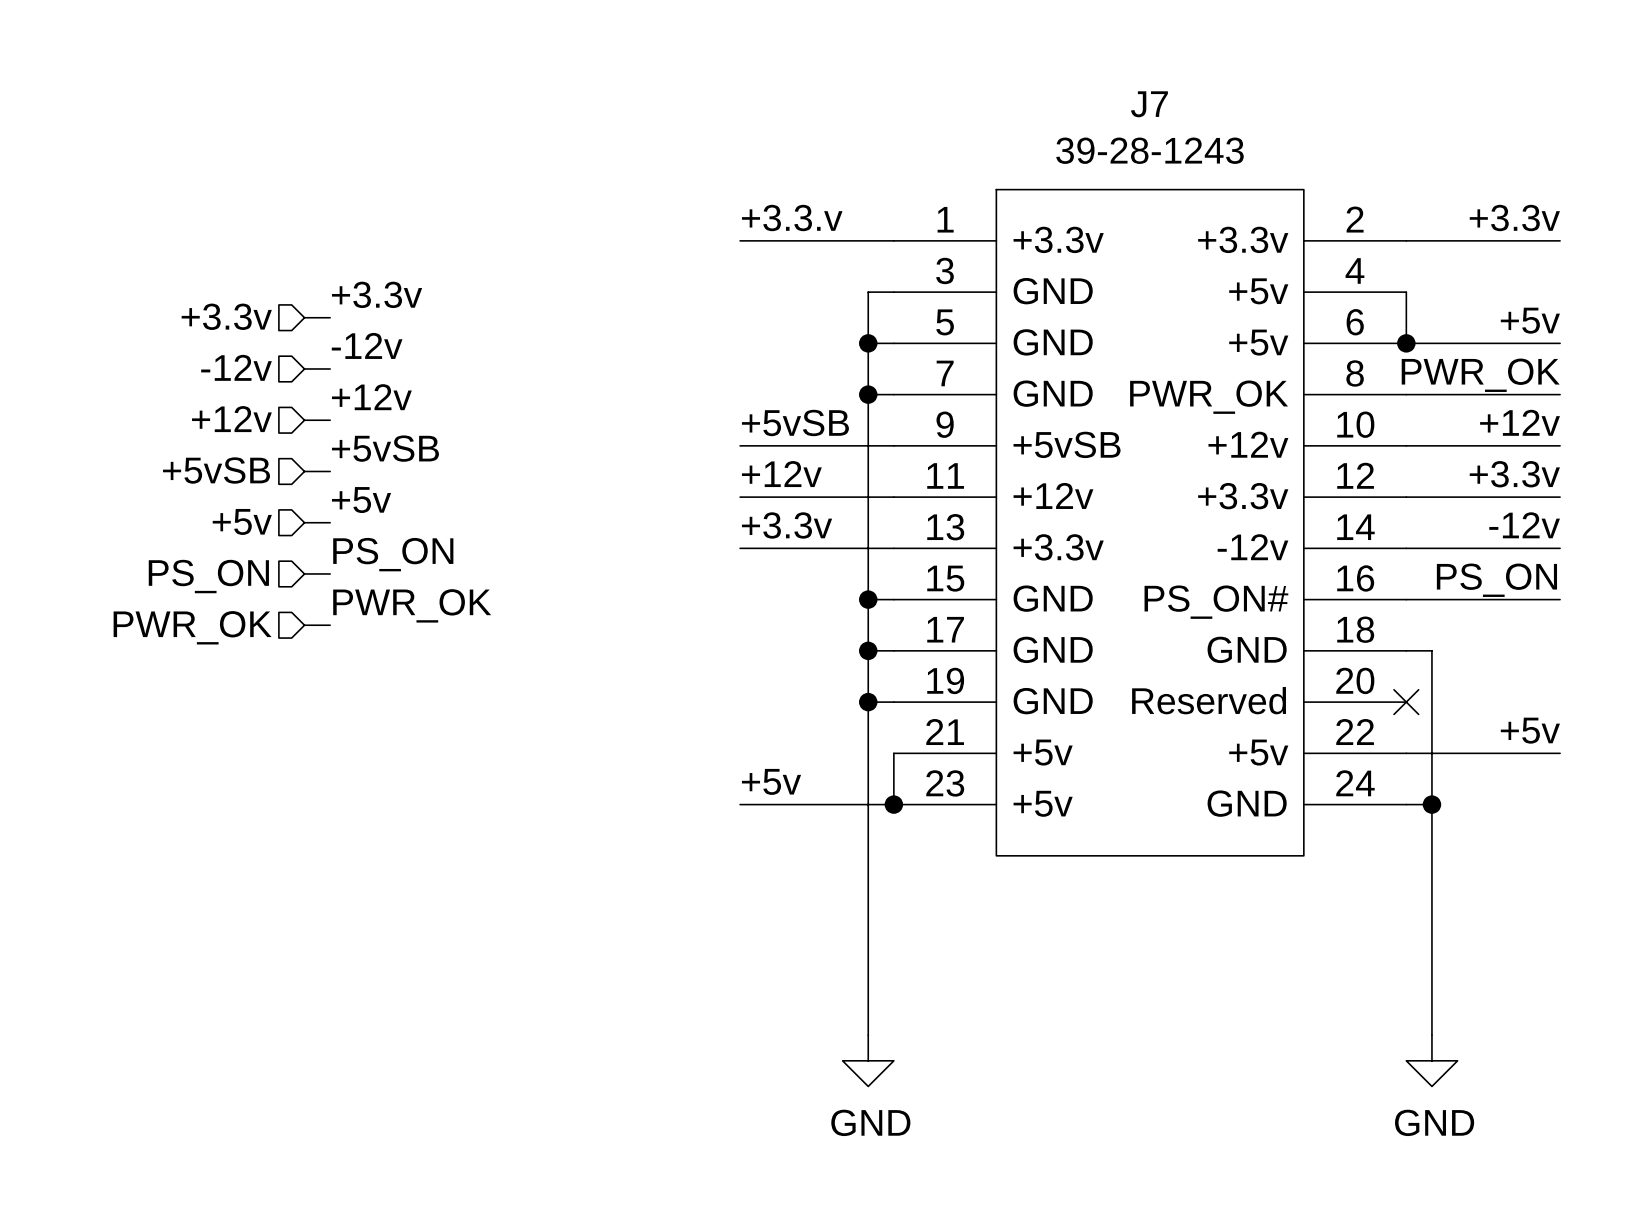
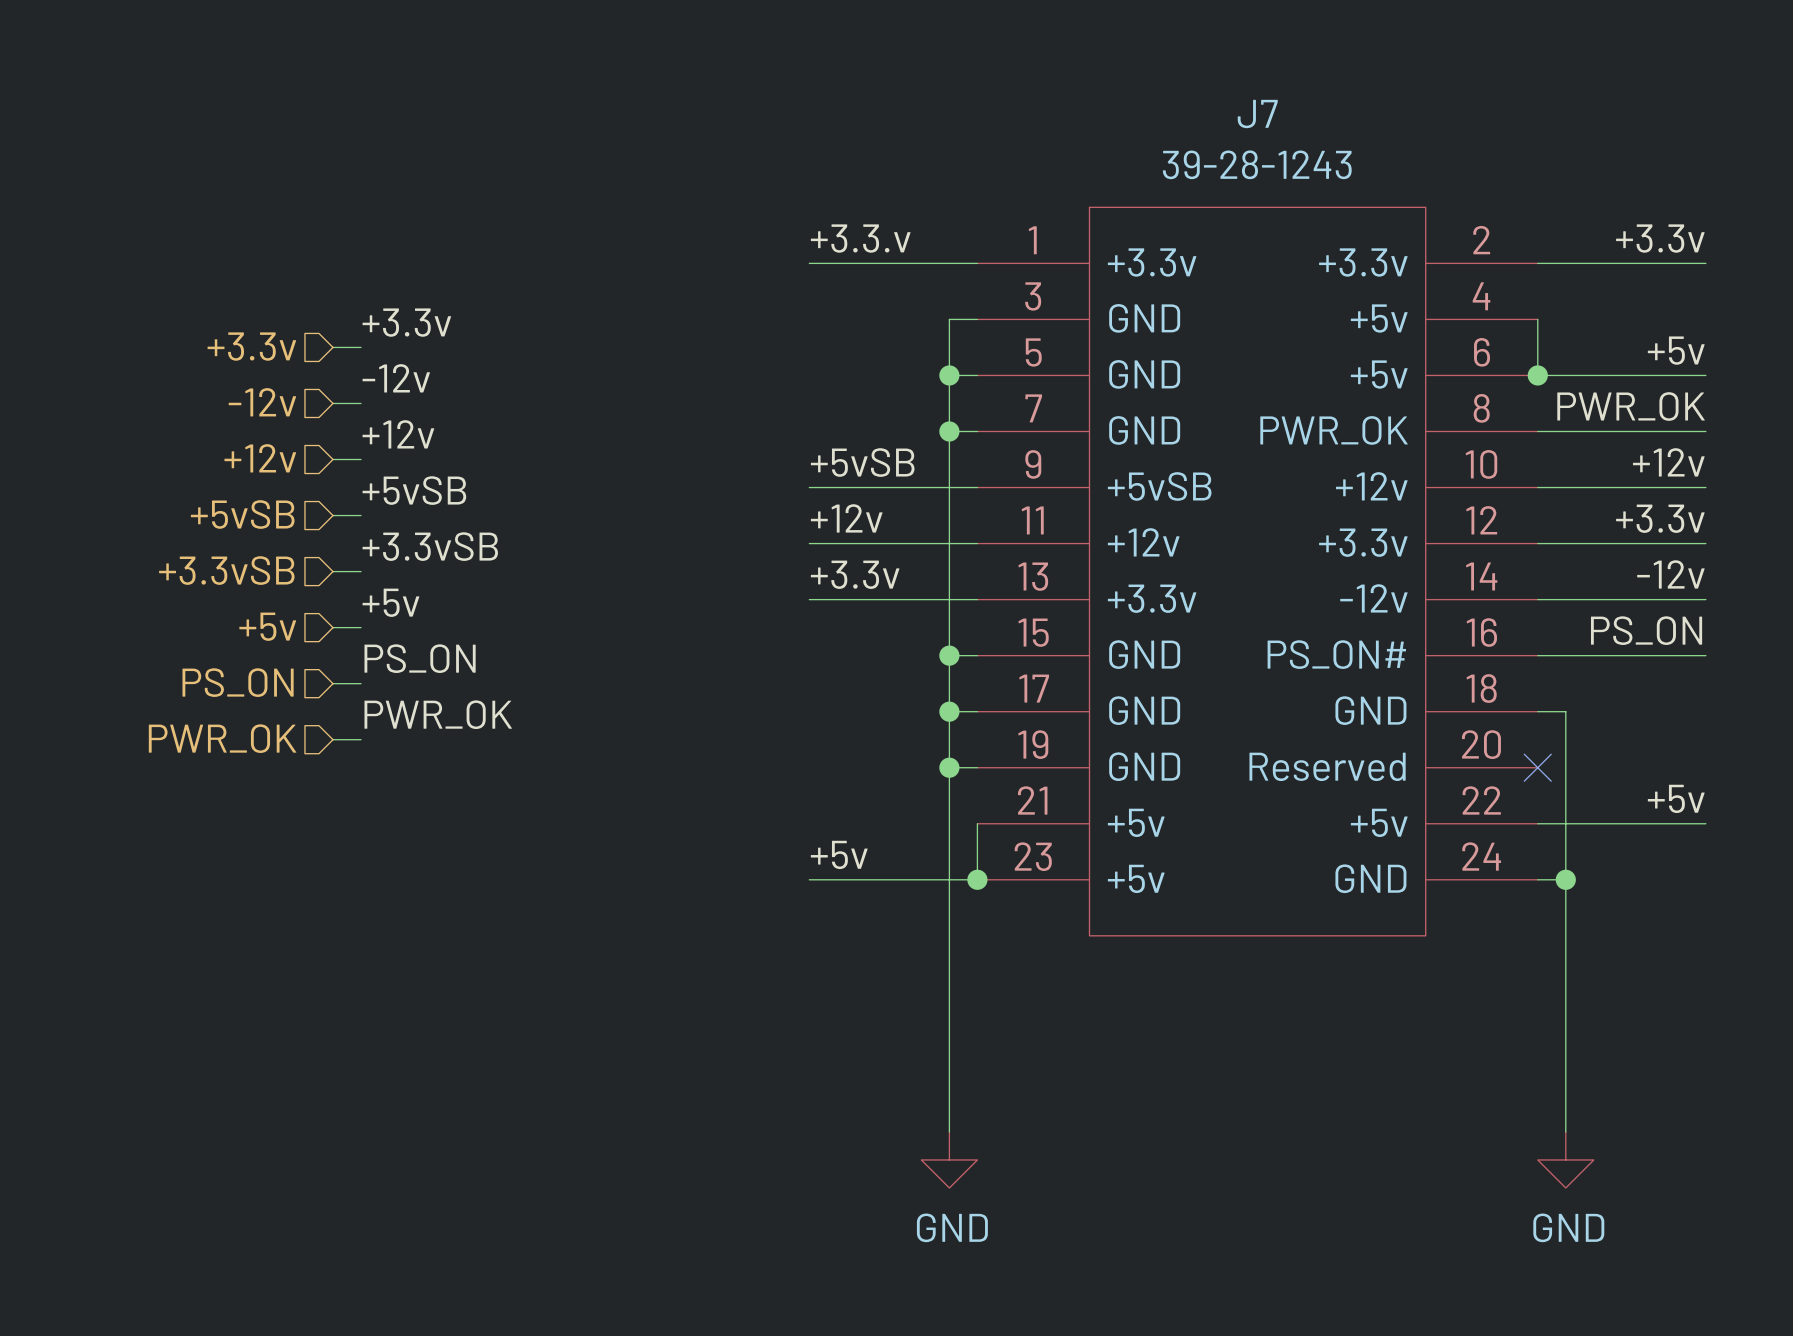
label: +5v (361, 500) -> +3.3vSB (430, 546)
hierarchical label: +5v (242, 521) -> +3.3vSB (226, 570)
label: PS_ON (393, 554) -> +5v (391, 602)
hierarchical label: PS_ON (208, 576) -> +5v (267, 626)
label: PWR_OK (412, 605) -> PS_ON (420, 658)
hierarchical label: PWR_OK (192, 627) -> PS_ON (238, 682)
label: none -> PWR_OK (438, 714)
wire: none -> (332, 739) (361, 739)
hierarchical label: none -> PWR_OK (222, 738)

